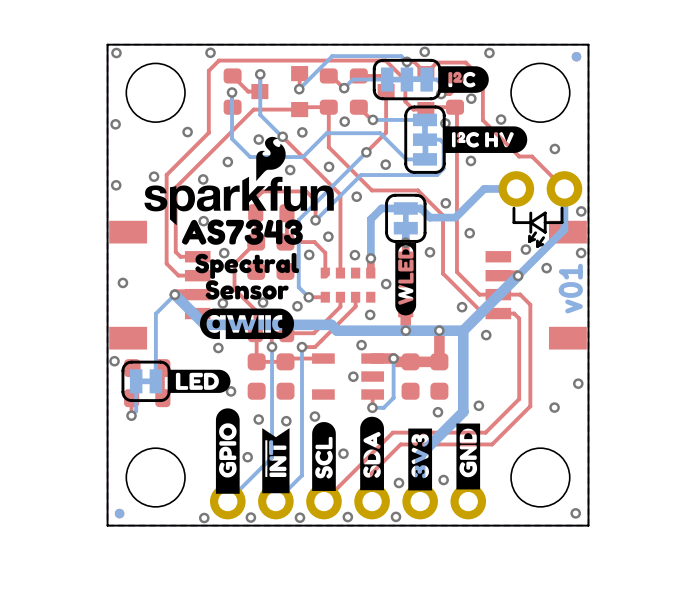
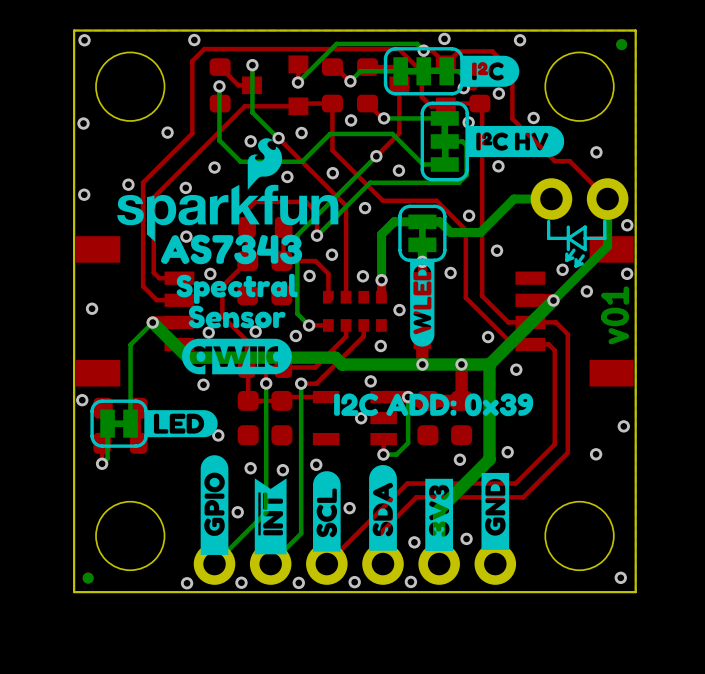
drawing: none -> [334, 393, 534, 417]

